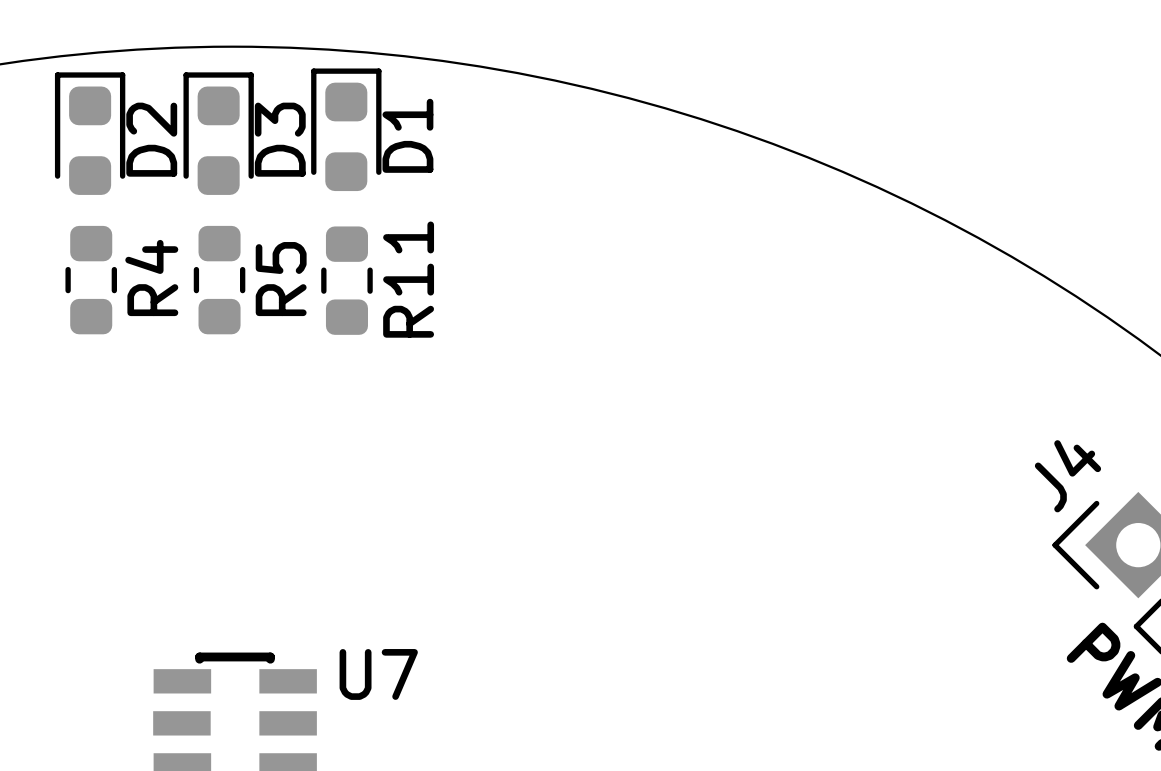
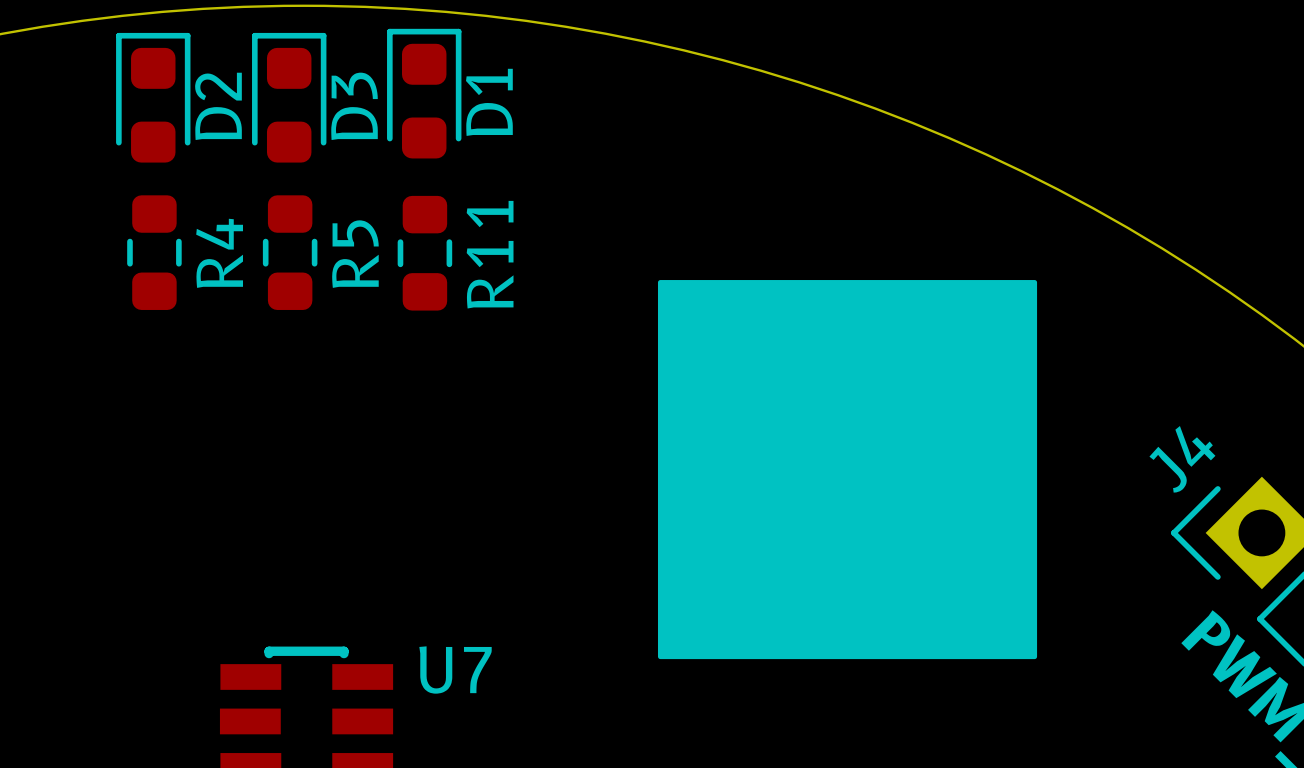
drawing: none -> [657, 280, 1038, 660]

